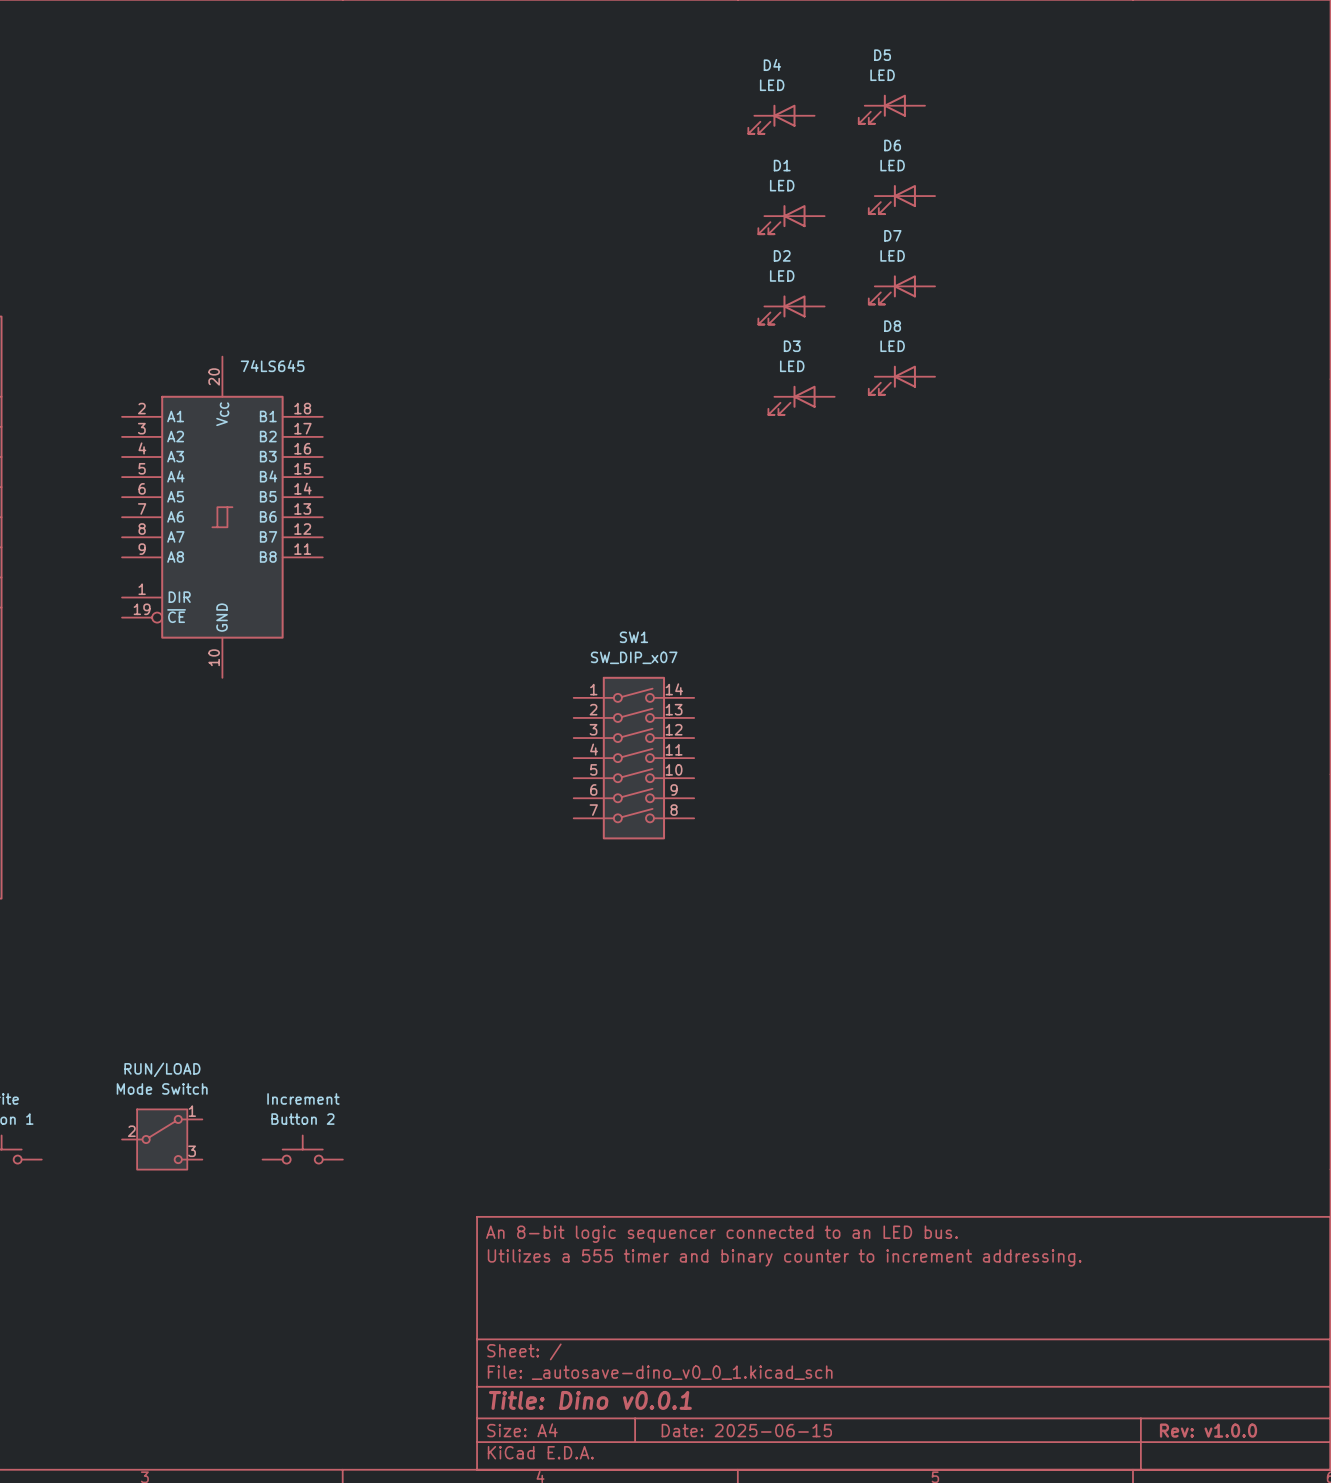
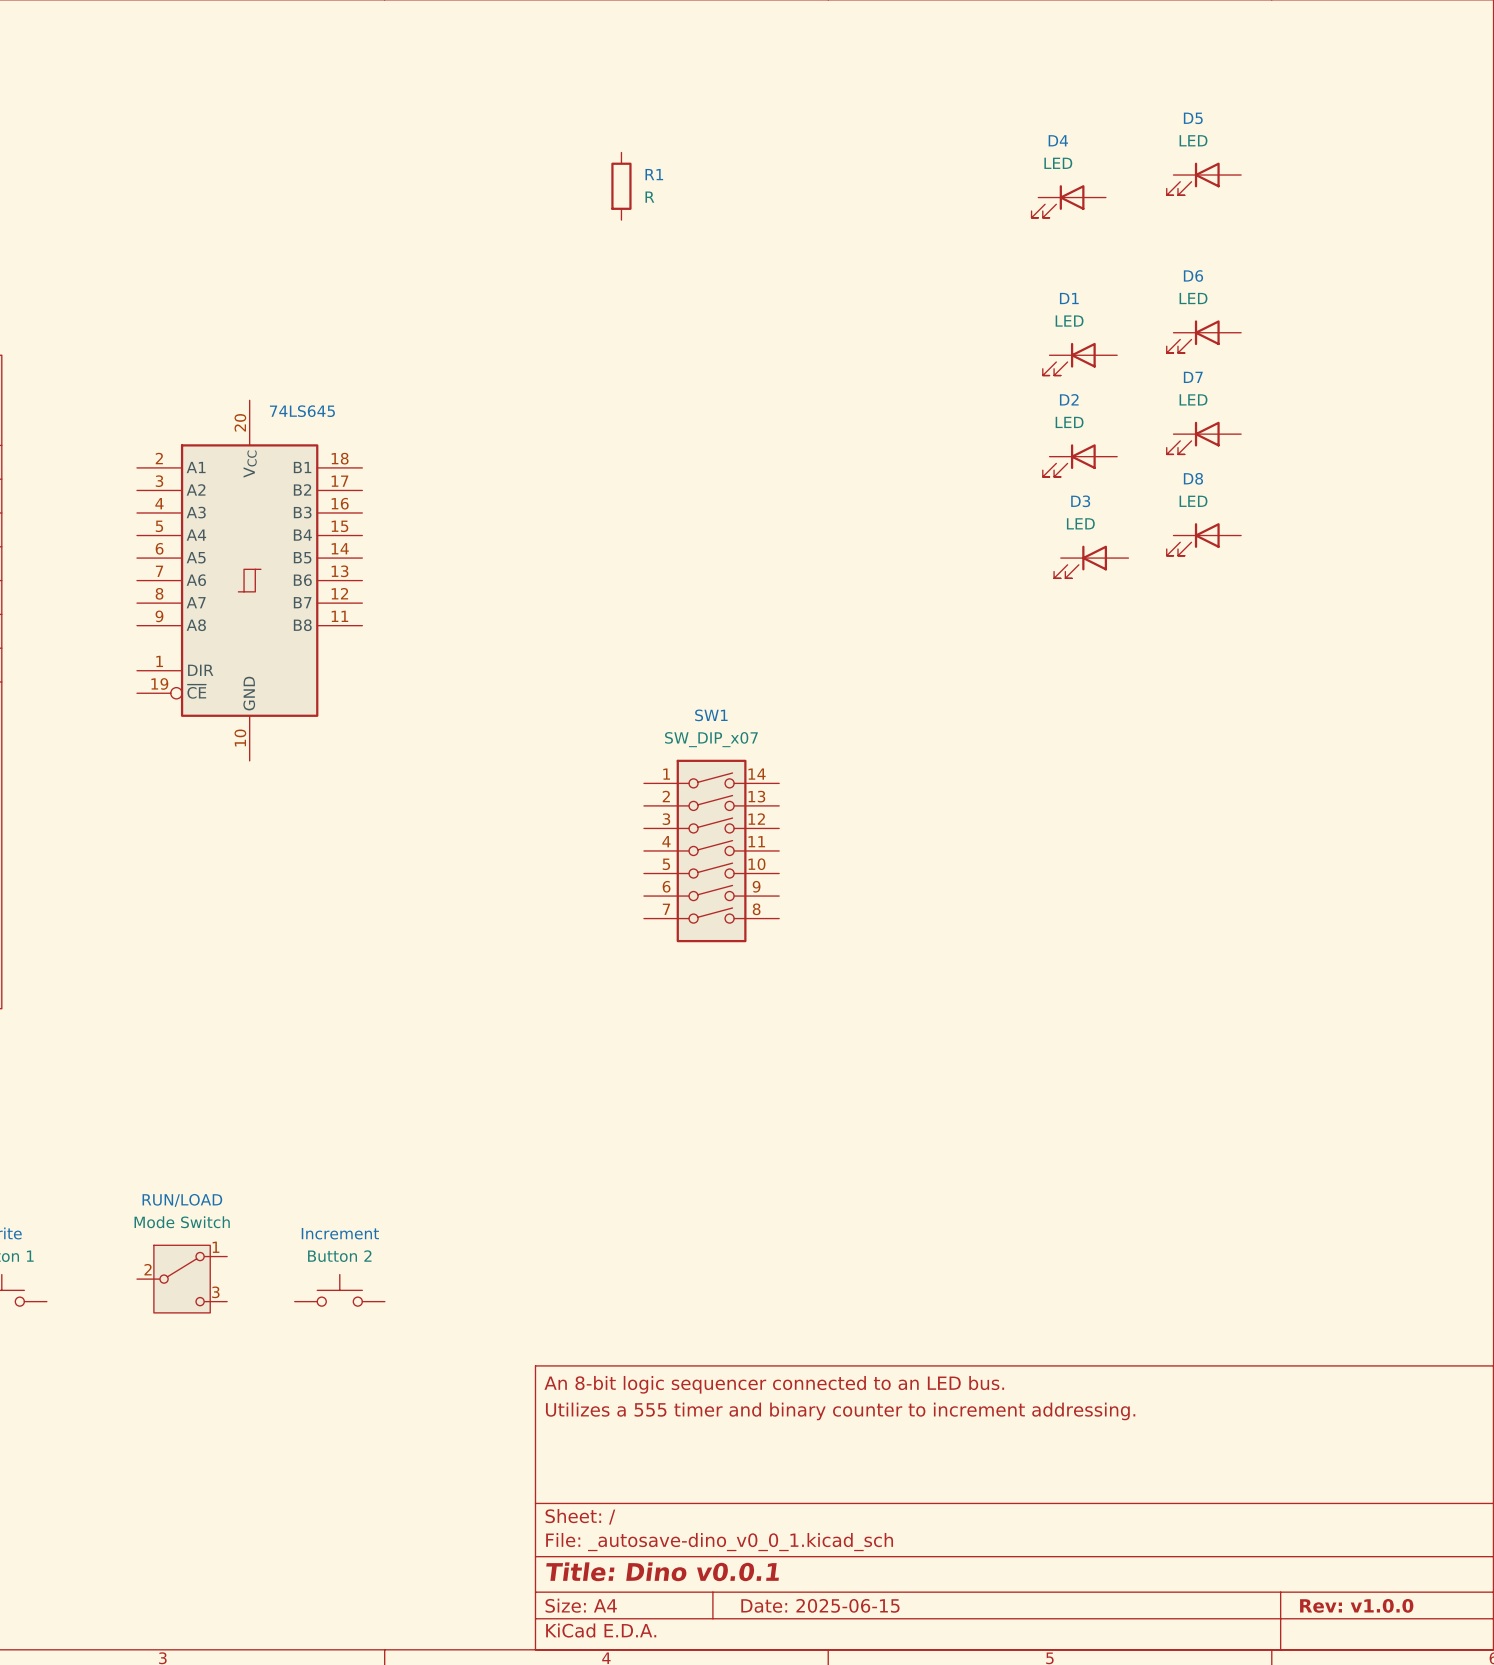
D5 position: (891, 109) -> (1203, 178)
D4 position: (781, 119) -> (1068, 201)
R1: none -> R (621, 186)
D6 position: (901, 199) -> (1203, 336)
D1 position: (791, 219) -> (1079, 359)
D7 position: (901, 289) -> (1203, 438)
D2 position: (791, 309) -> (1079, 460)
D8 position: (901, 380) -> (1203, 539)
D3 position: (801, 400) -> (1091, 562)

